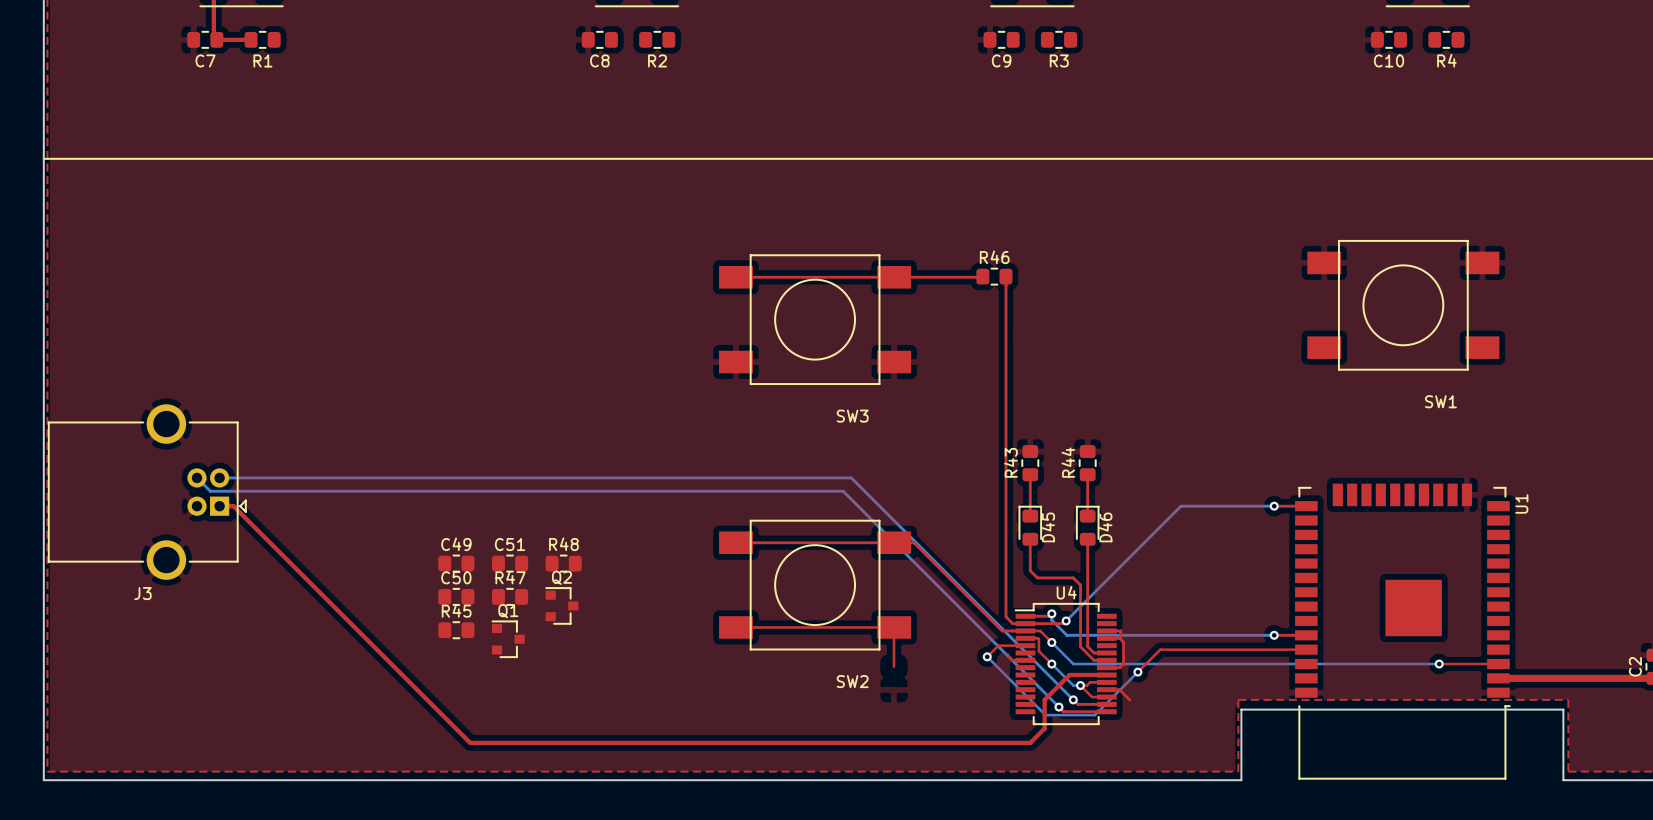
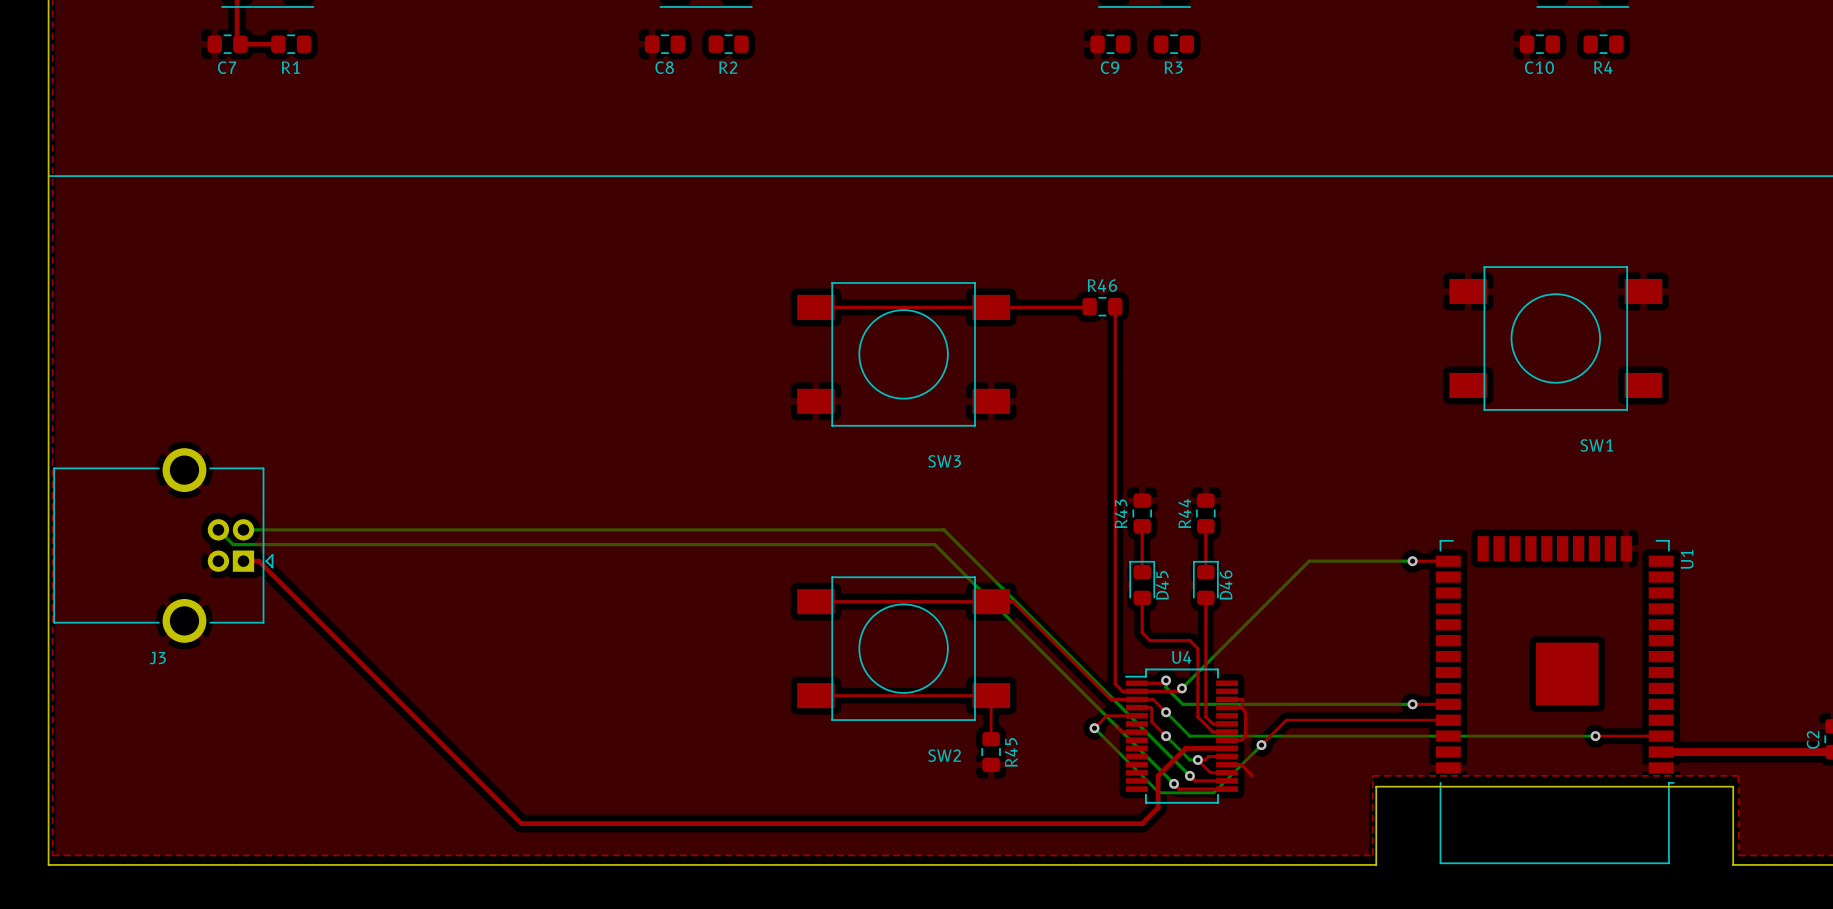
C49: (456, 563) -> none
C51: (510, 563) -> none
R48: (563, 563) -> none
C50: (456, 596) -> none
R47: (510, 596) -> none
Q2: (561, 605) -> none
R45 rotation: 0° (456, 630) -> 90° clockwise (991, 752)
R45 position: (456, 630) -> (991, 752)
Q1: (508, 639) -> none

